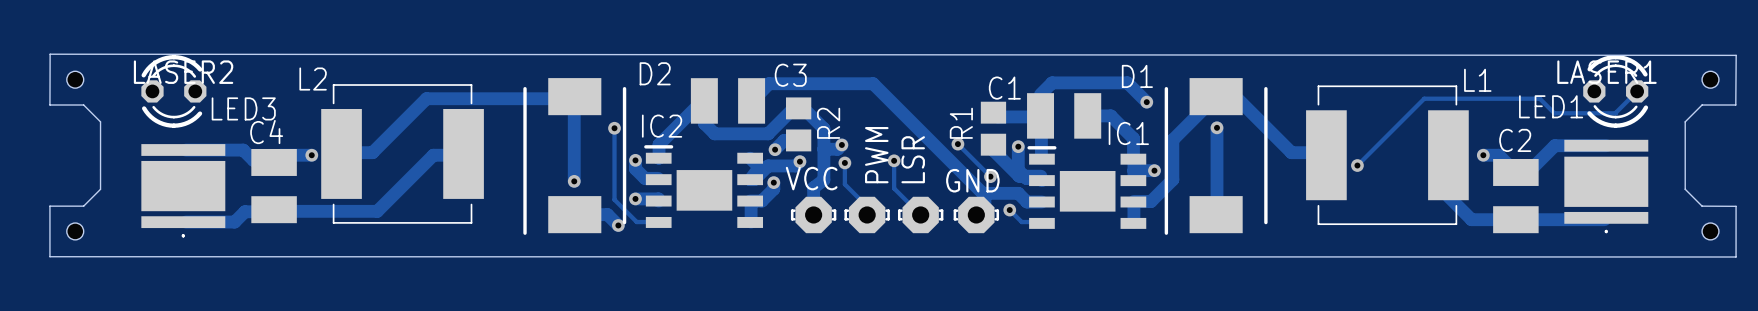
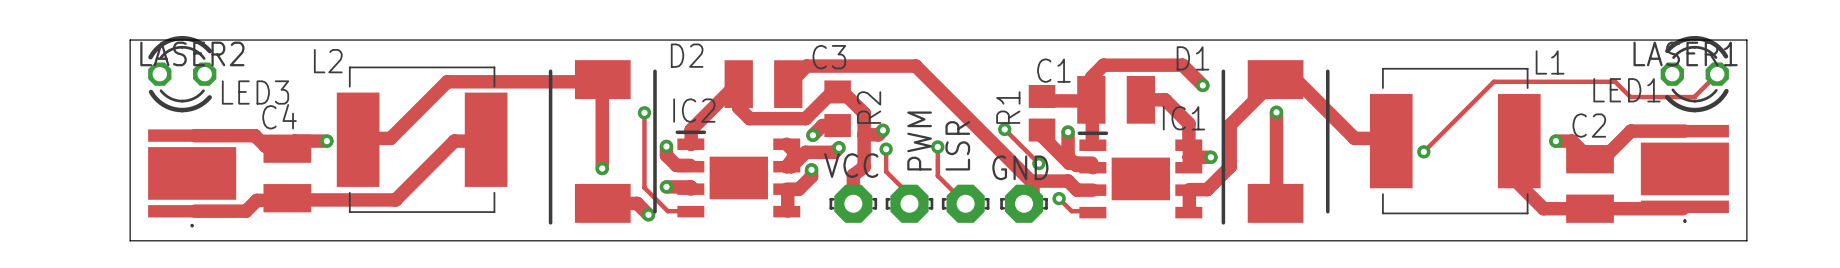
board edge: (50, 54) (1736, 55) (1735, 105) (1702, 105) (1685, 121) (1685, 189) (1702, 206) (1736, 206) (1736, 257) (49, 256) (49, 206) (83, 206) (100, 189) (100, 121) (83, 105) (49, 105) (50, 54) -> (130, 40) (130, 240) (1746, 240) (1746, 40) (130, 40)
hole: (75, 79) -> none
hole: (1710, 79) -> none
hole: (75, 231) -> none
hole: (1710, 231) -> none

